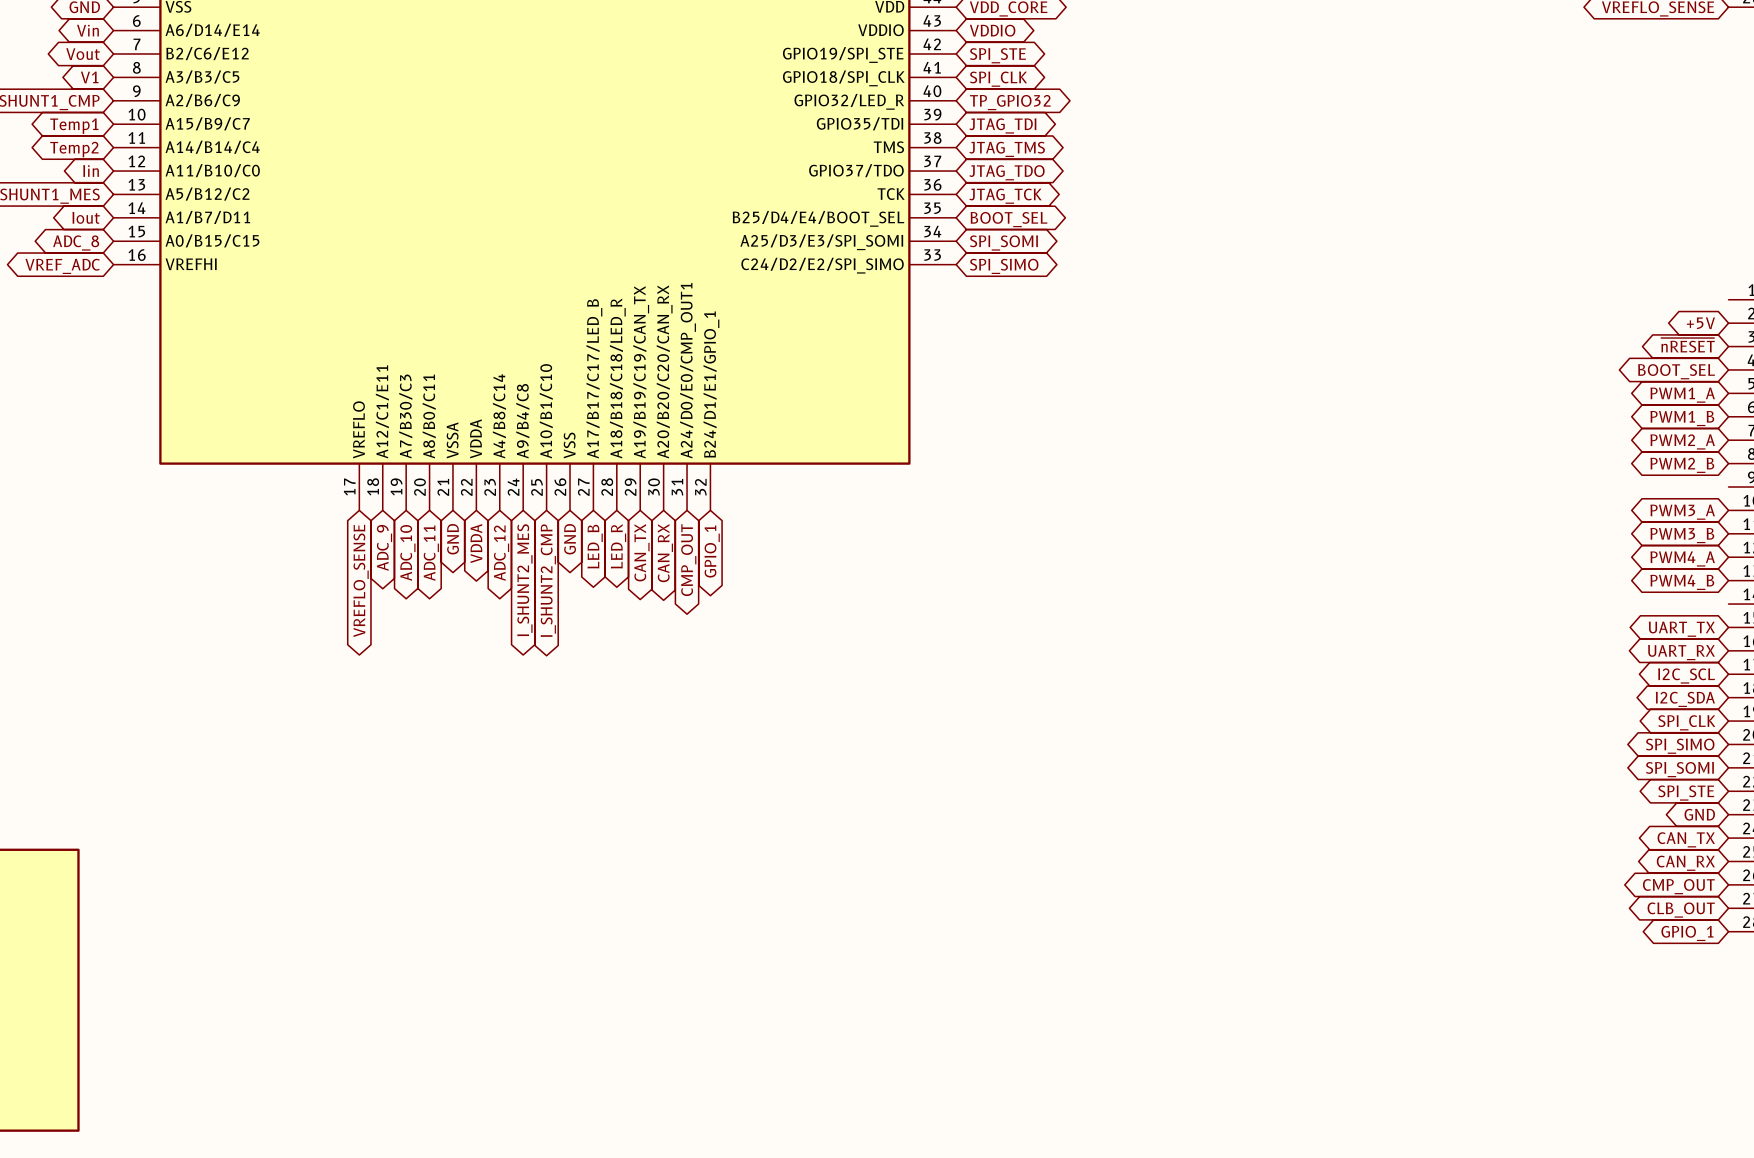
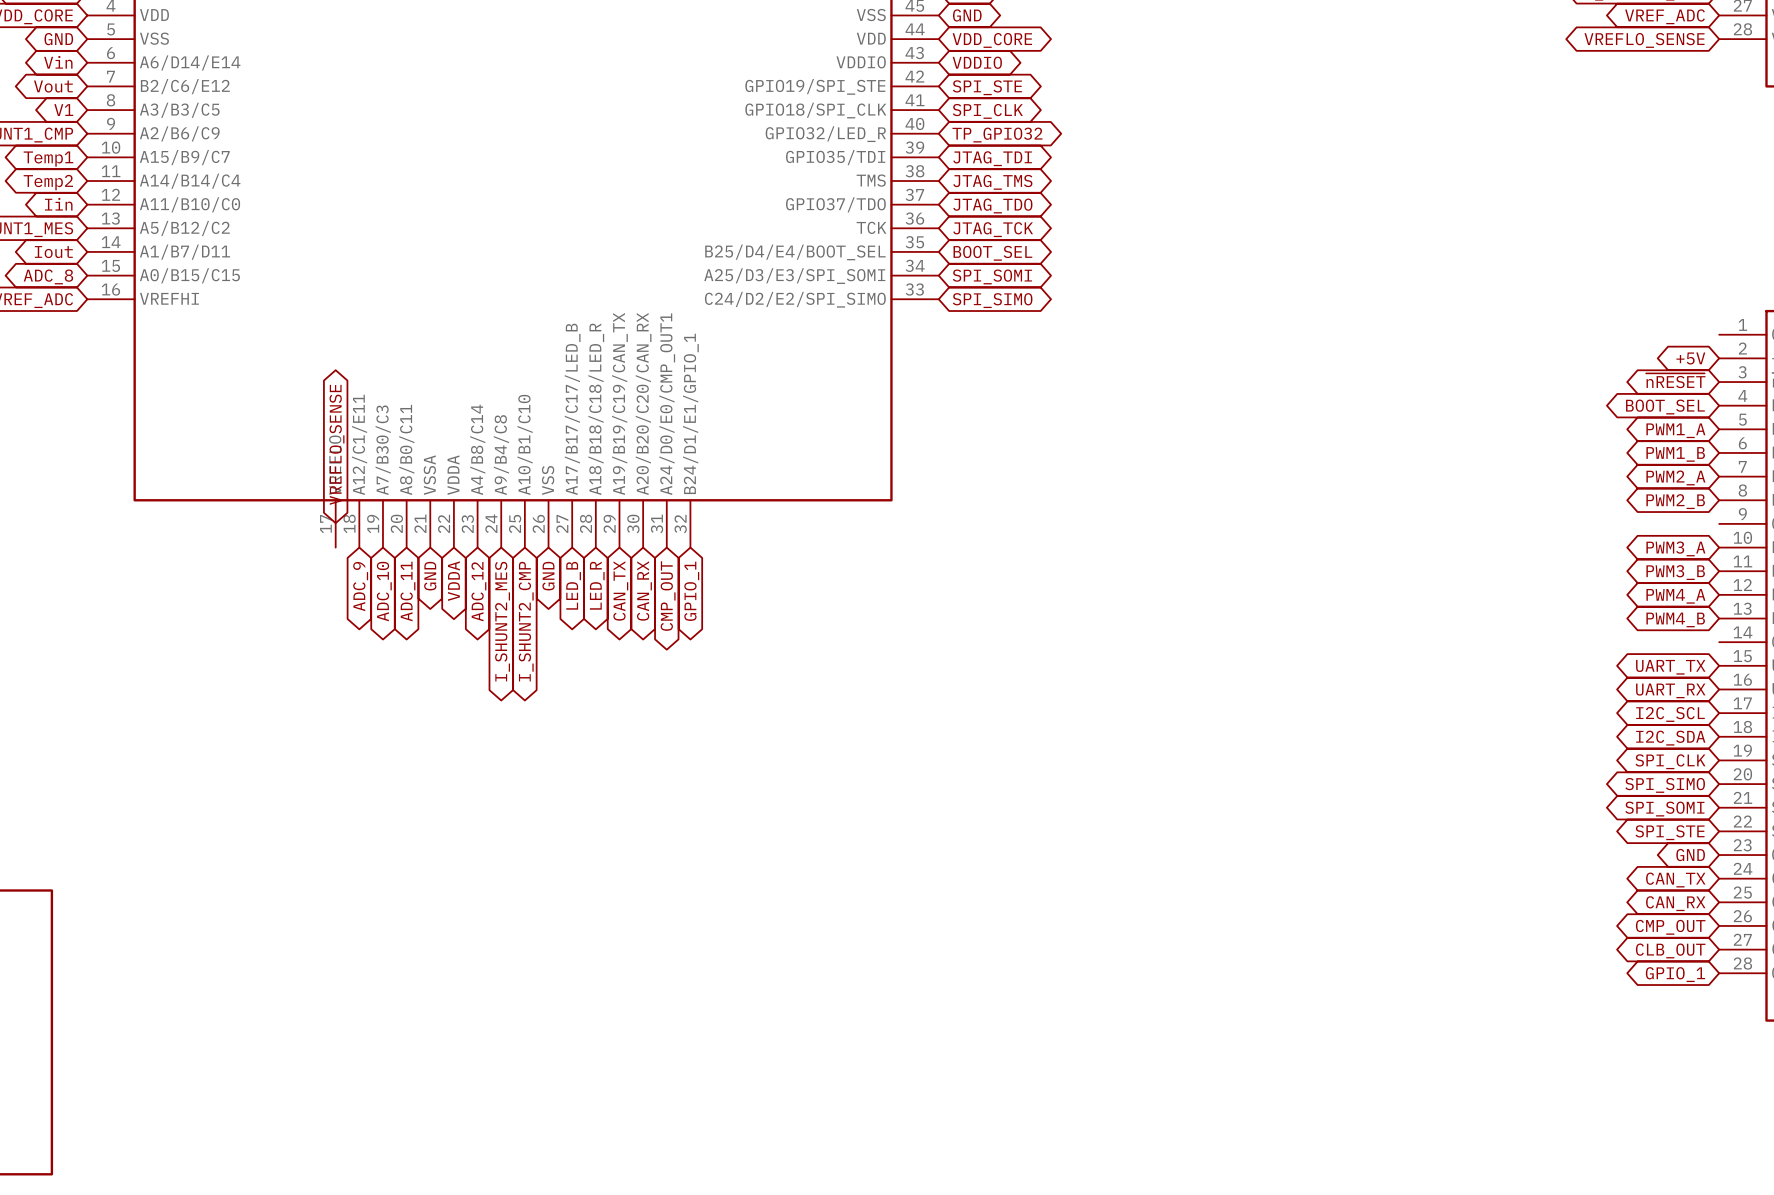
global label position: VREFLO_SENSE (361, 580) -> VREFLO_SENSE (337, 444)

